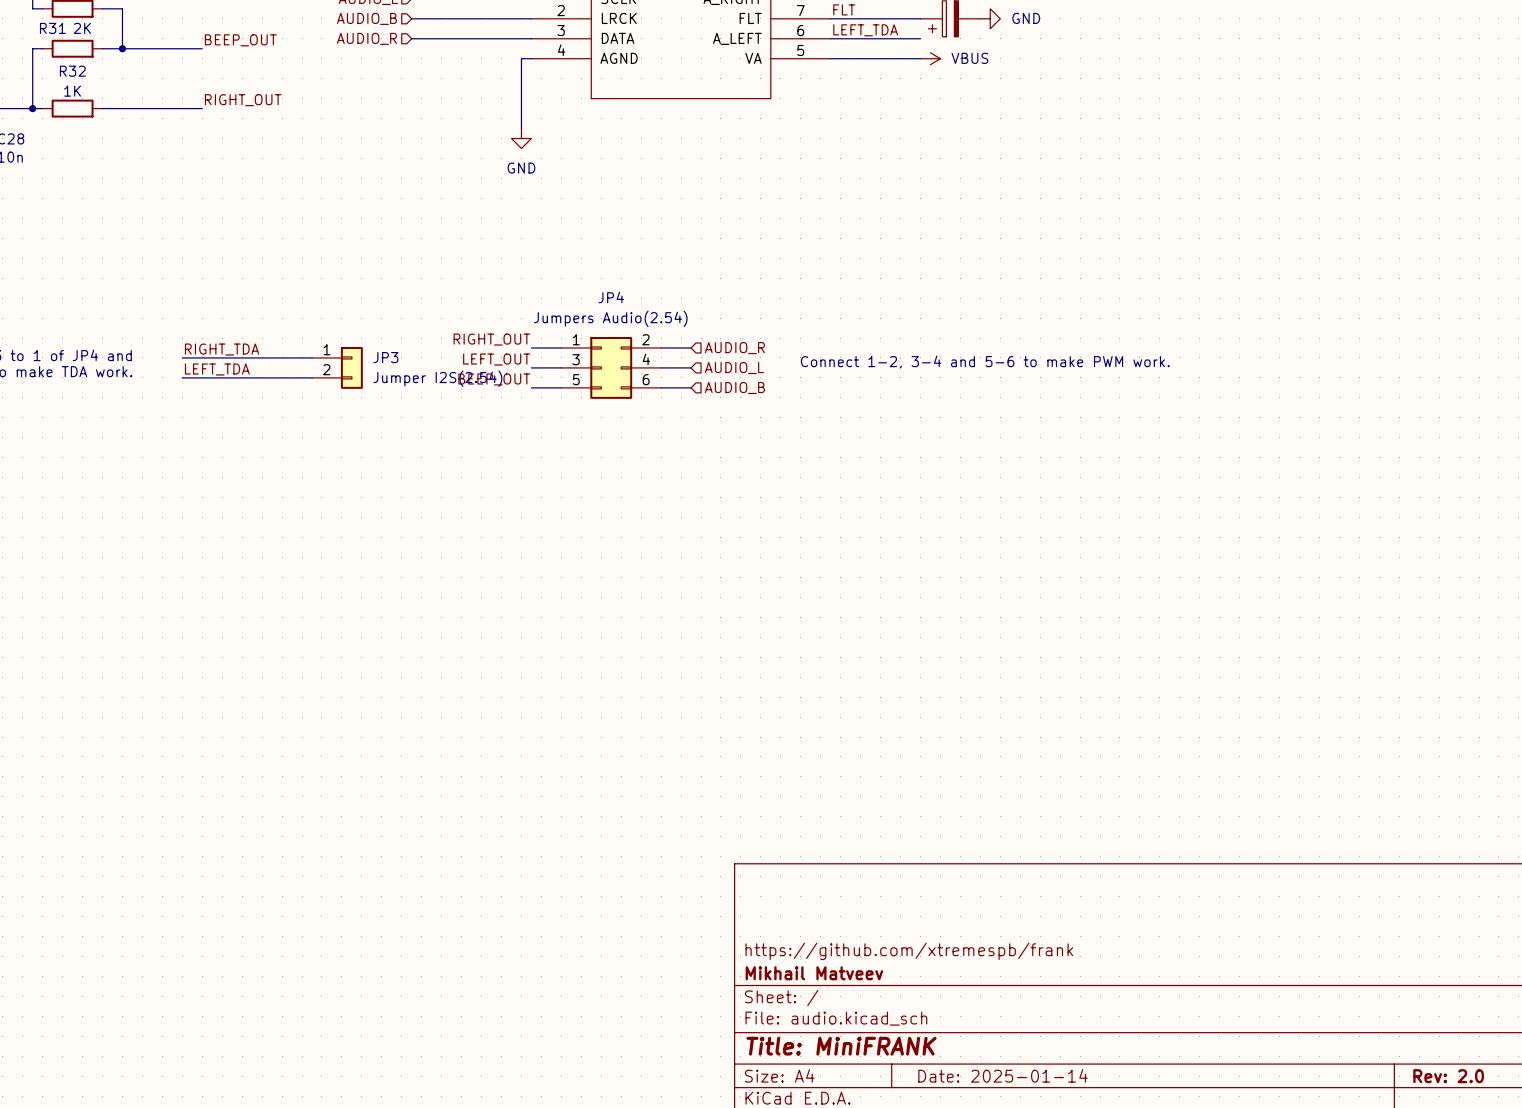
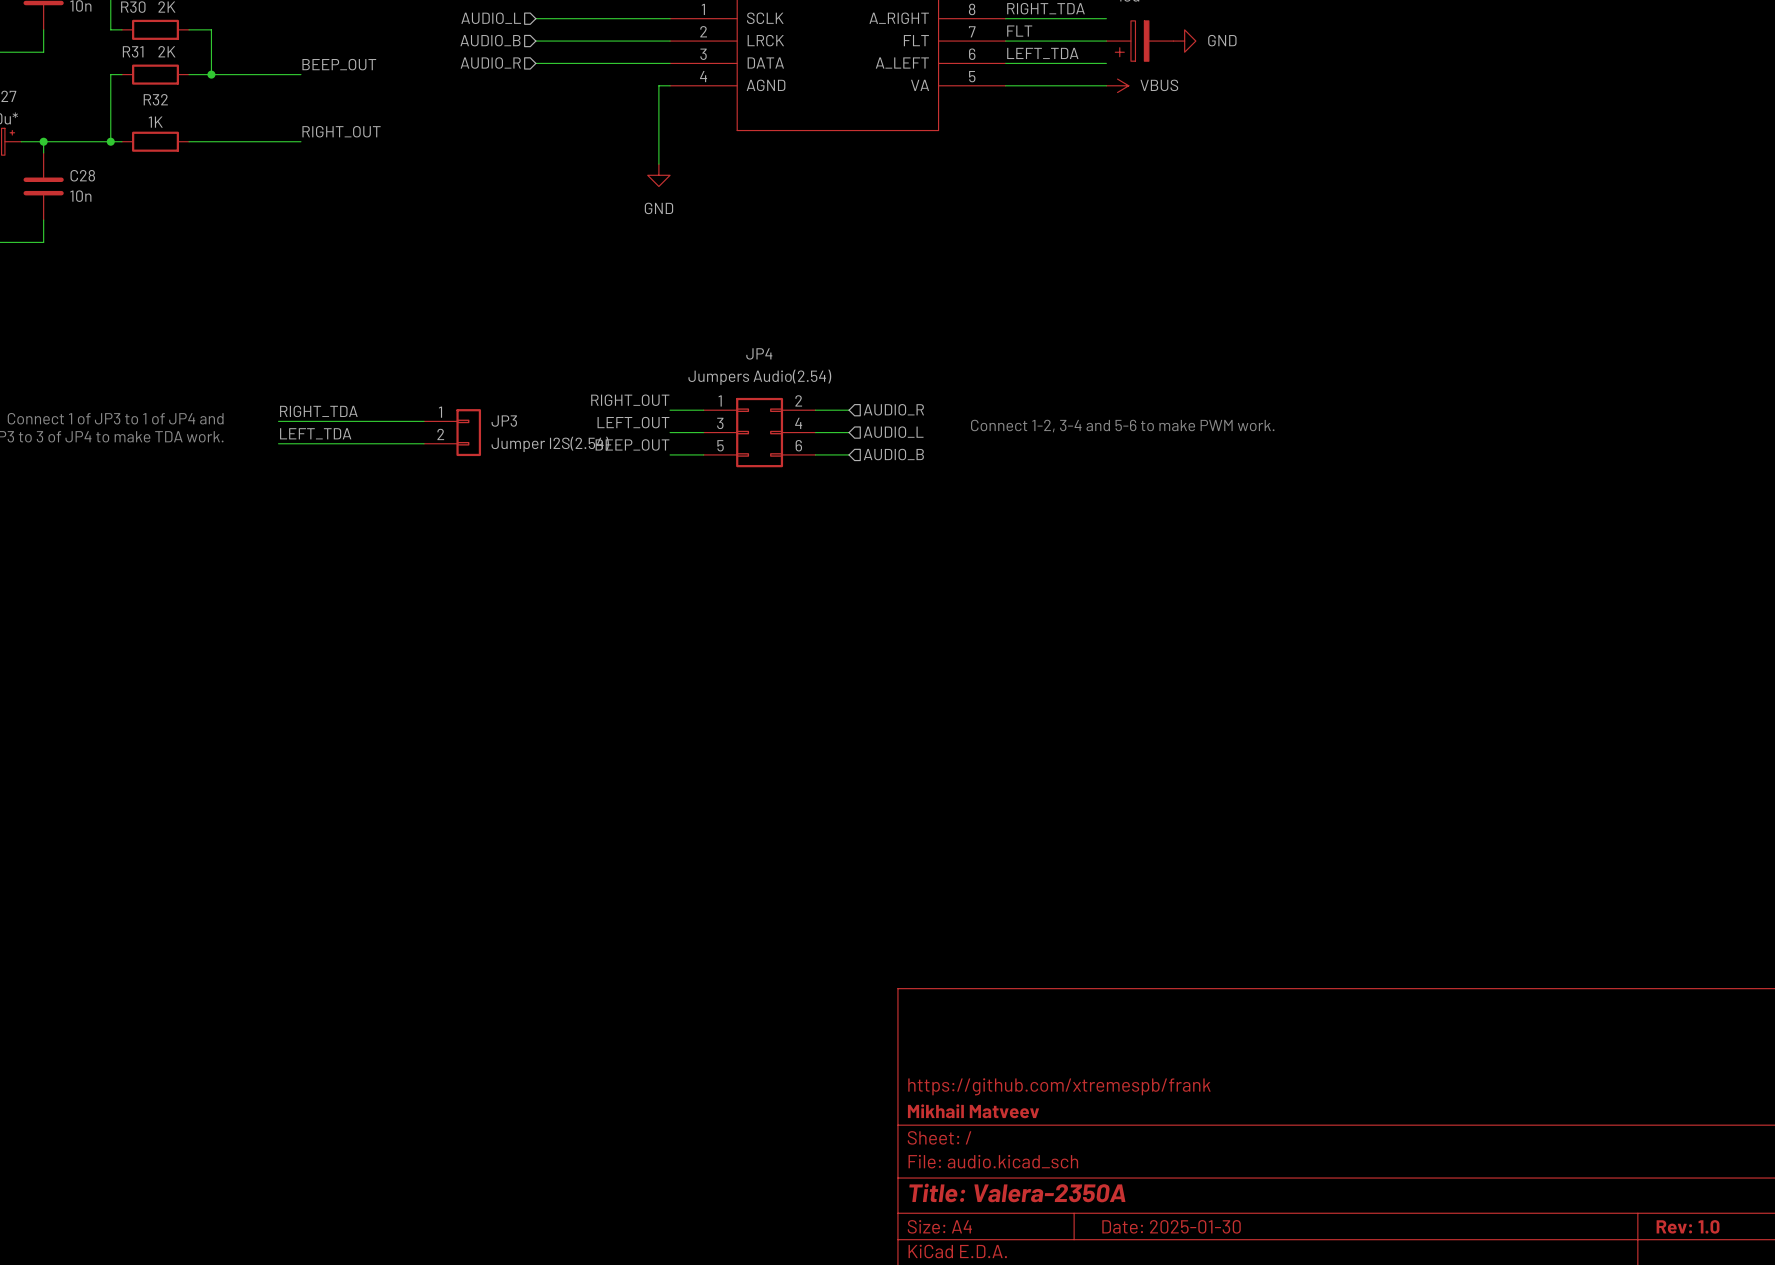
title block: Title: MiniFRANK (841, 1046) -> Title: Valera-2350A (1017, 1192)
title block: Date: 2025-01-14 (1003, 1075) -> Date: 2025-01-30 (1171, 1226)
title block: Rev: 2.0 (1448, 1076) -> Rev: 1.0 (1688, 1226)

